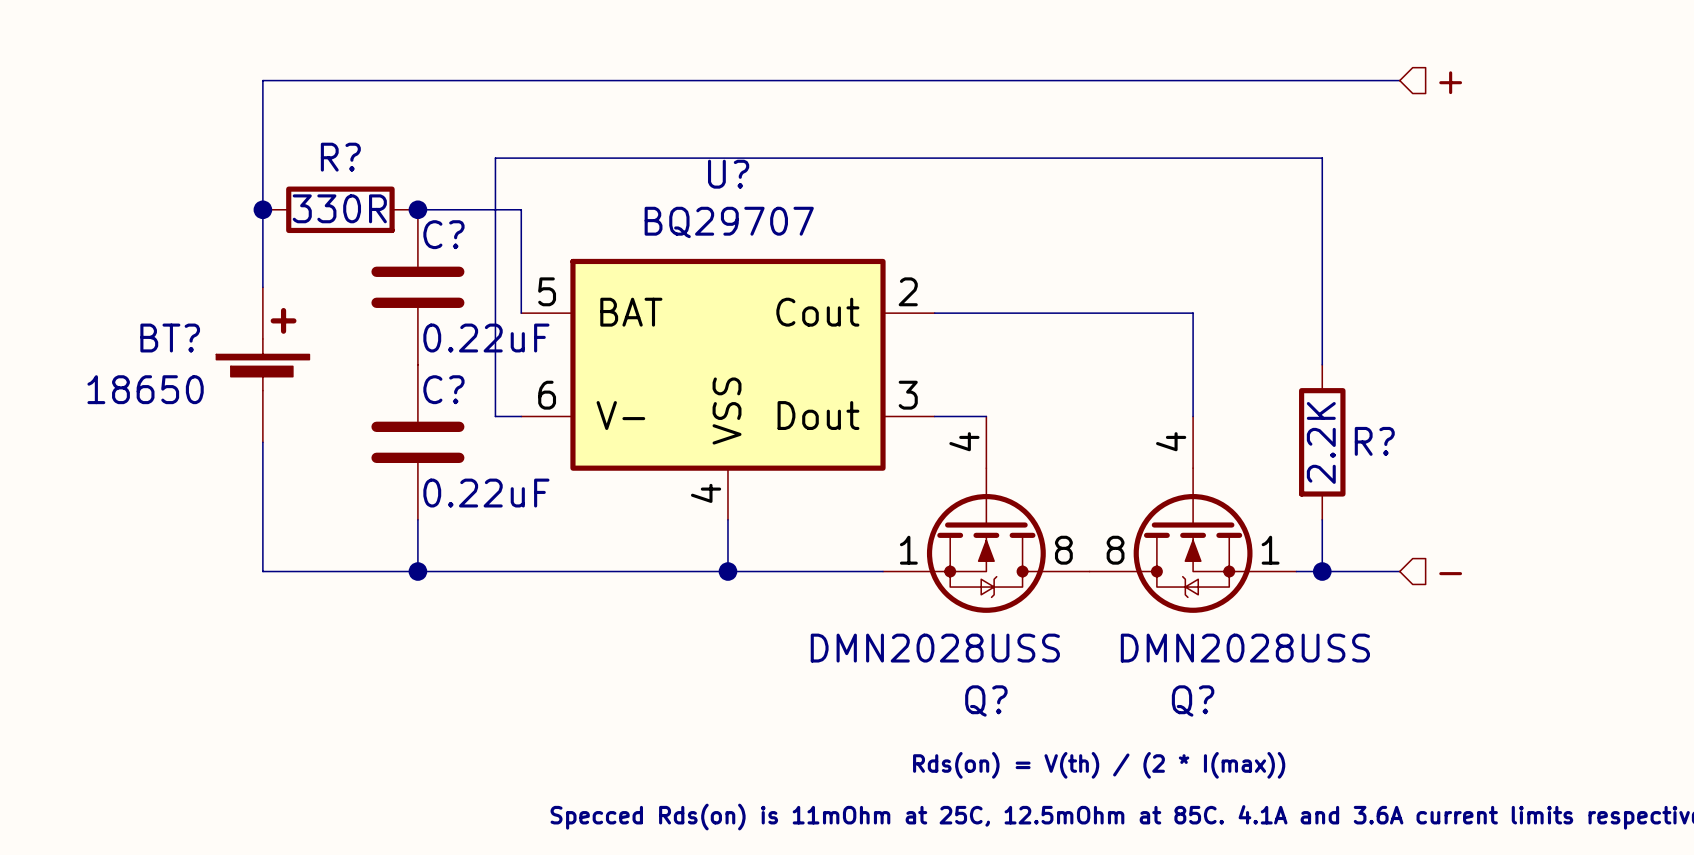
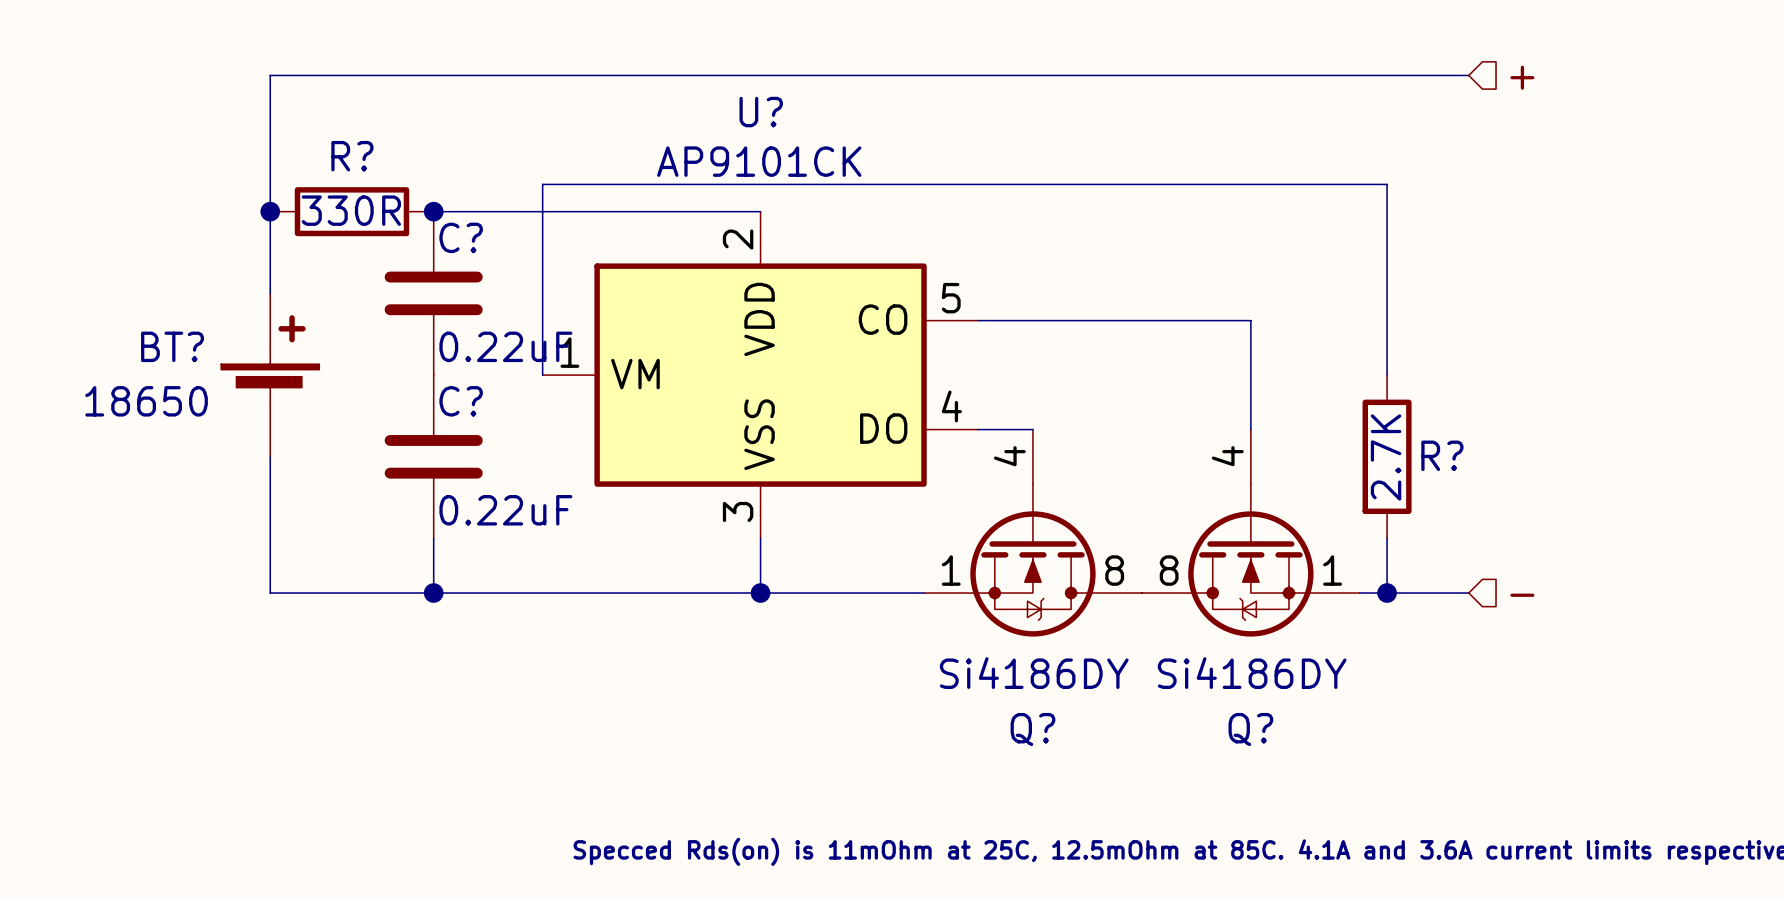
wire: (1322, 183) (1322, 158) (495, 158) (495, 416) (521, 416) -> (1387, 184) (542, 184) (542, 211) (760, 211)
wire: none -> (542, 320) (542, 375)
U?: none -> AP9101CK (760, 375)
U?: BQ29707 (727, 389) -> none
R? value: 2.2K (1321, 442) -> 2.7K (1386, 457)
Q? value: DMN2028USS (935, 648) -> Si4186DY (1034, 673)
Q? value: DMN2028USS (1245, 648) -> Si4186DY (1252, 673)
text: Rds(on) = V(th) / (2 * I(max)) (1099, 765) -> none

